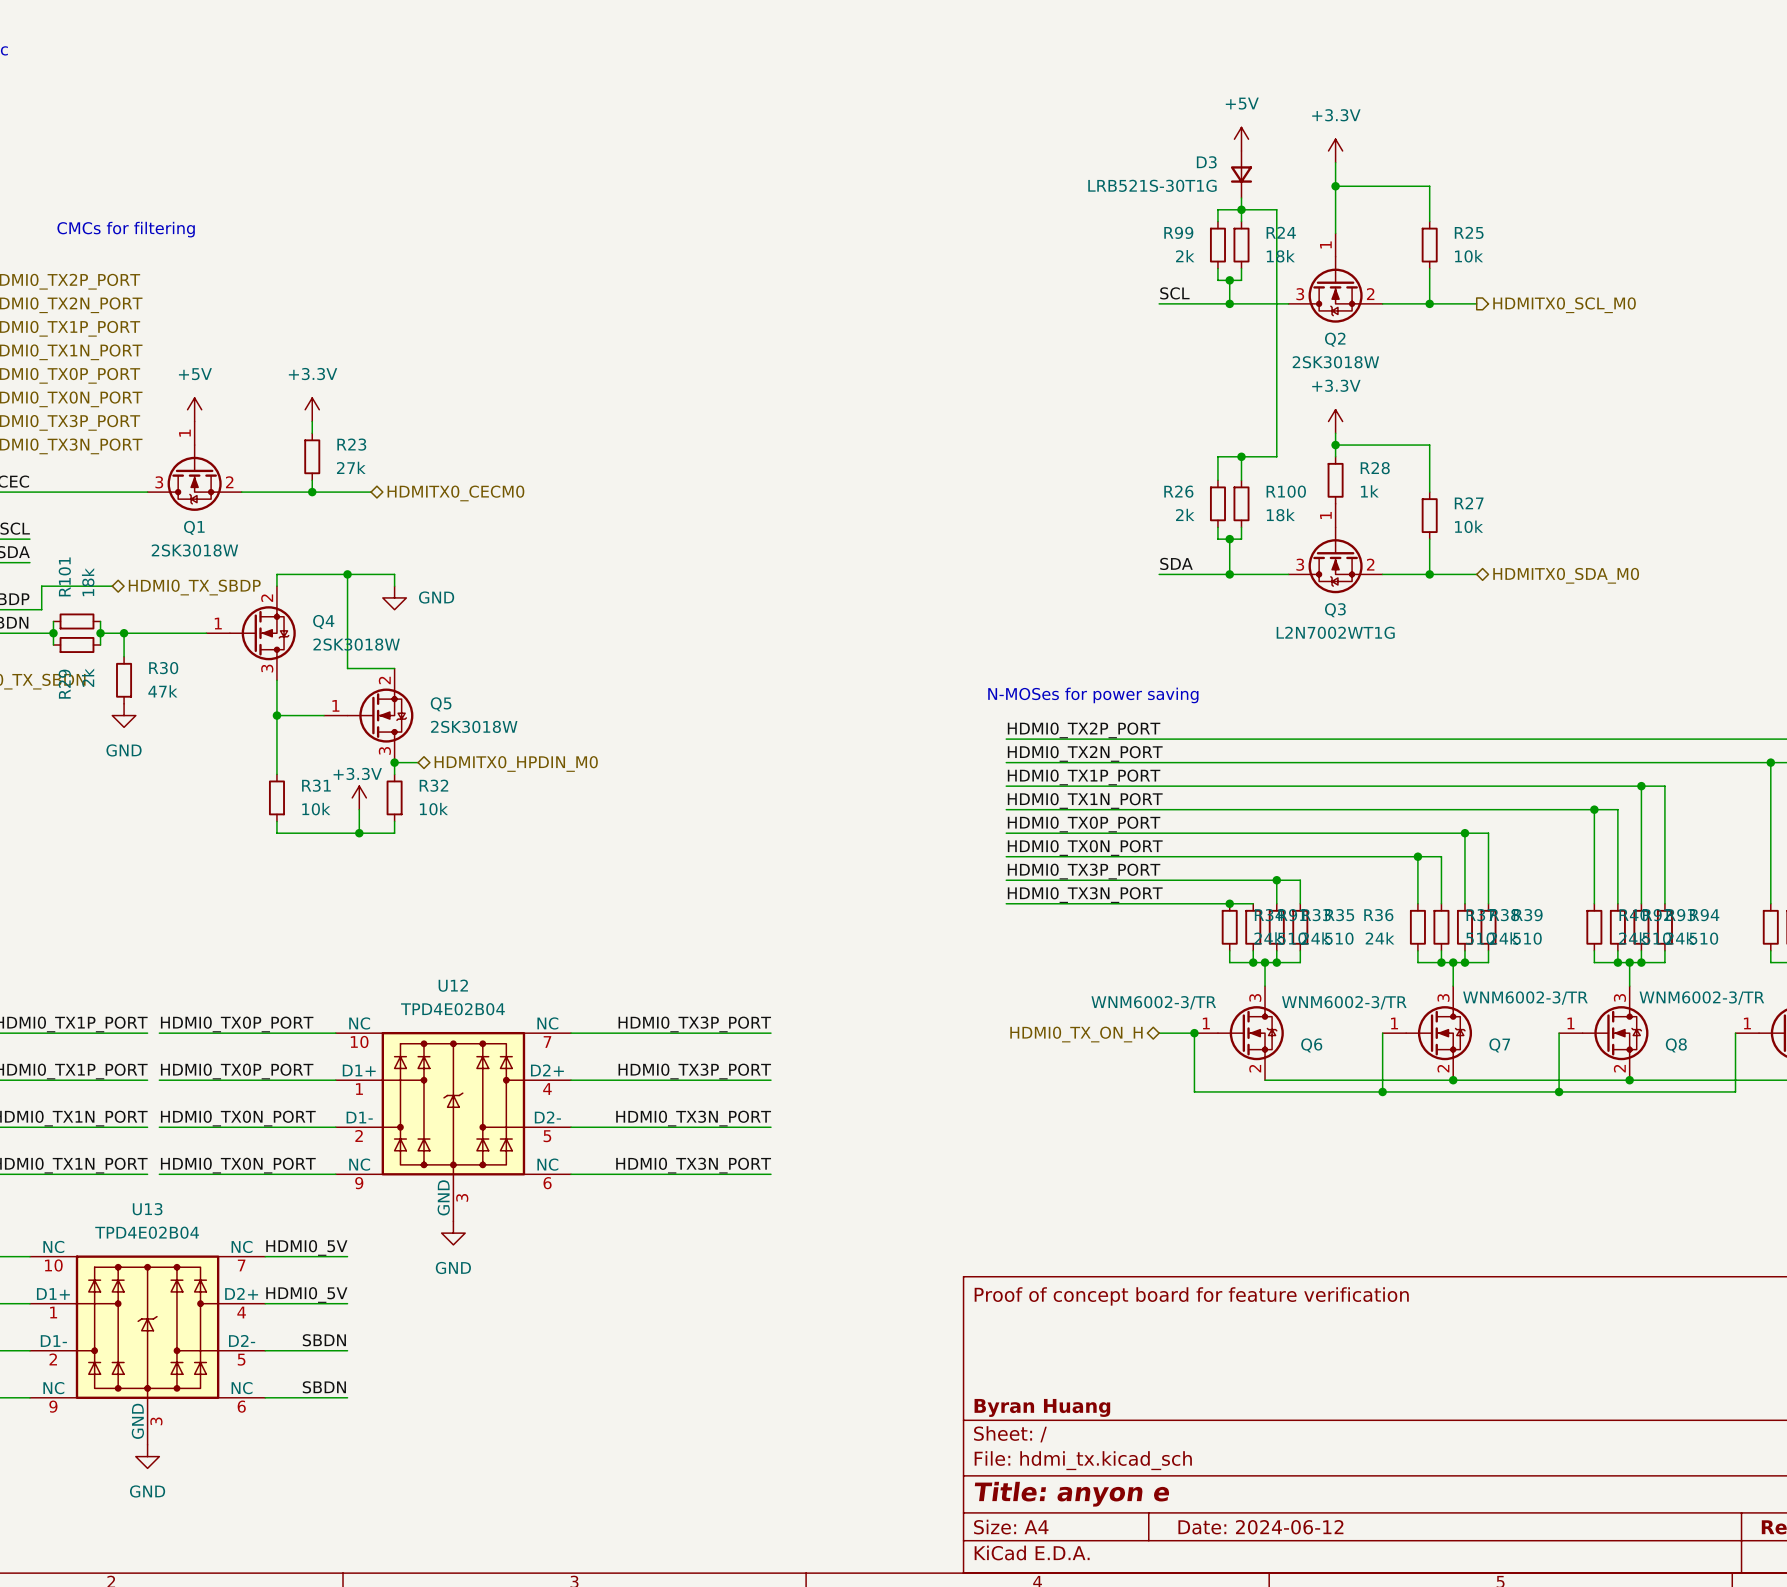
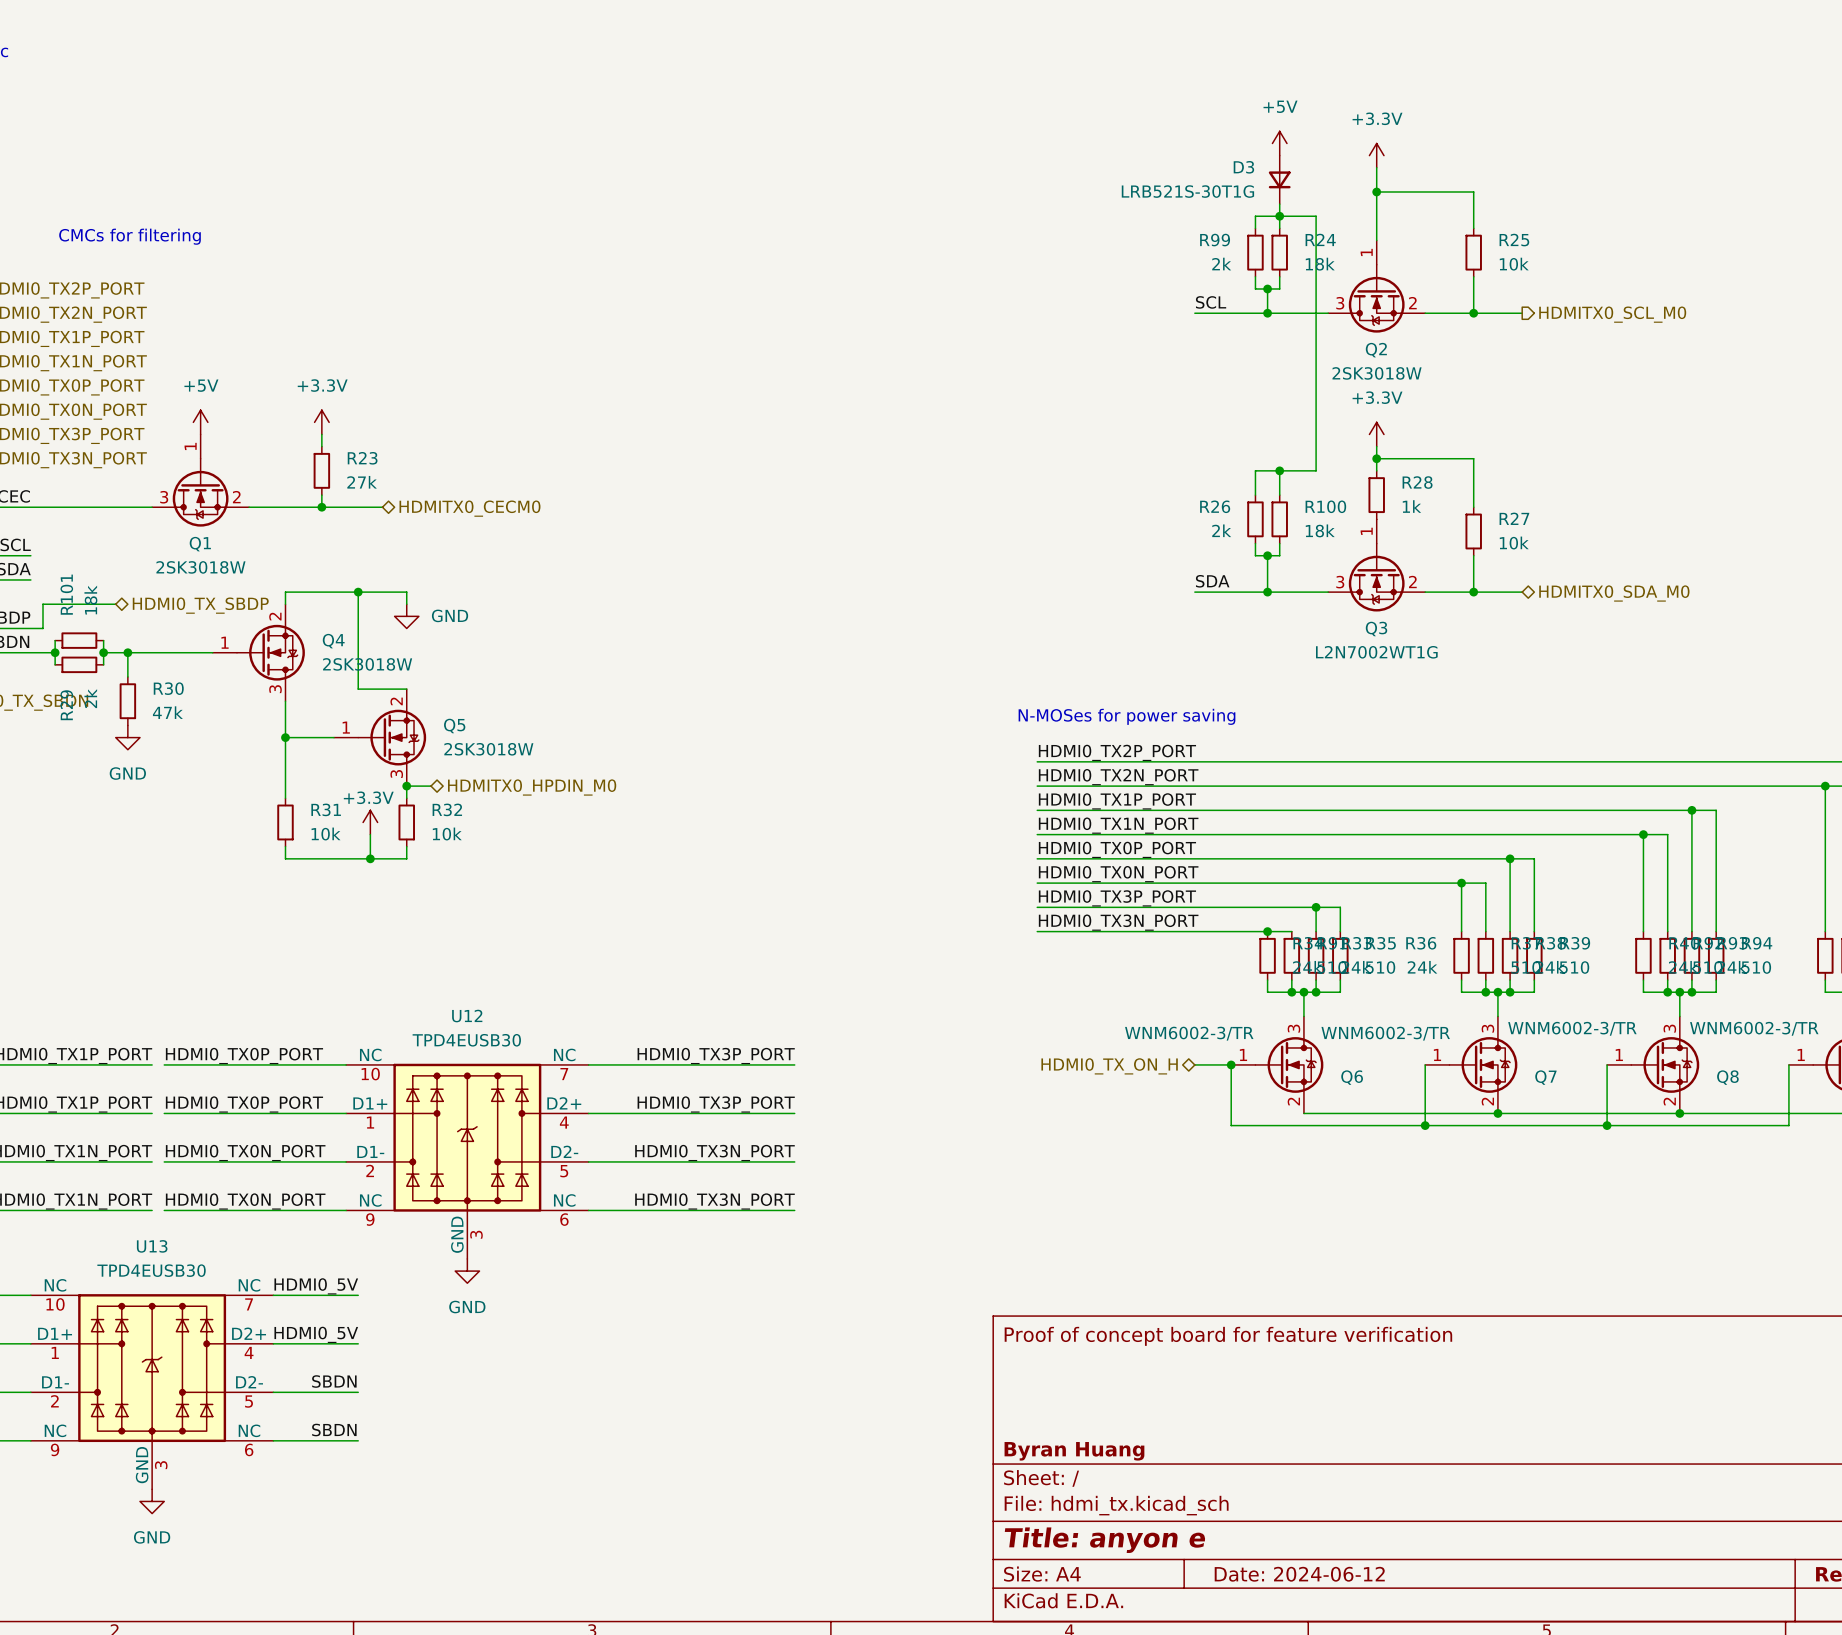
U12 value: TPD4E02B04 (452, 1009) -> TPD4EUSB30 (466, 1040)
U13 value: TPD4E02B04 (147, 1232) -> TPD4EUSB30 (151, 1270)

